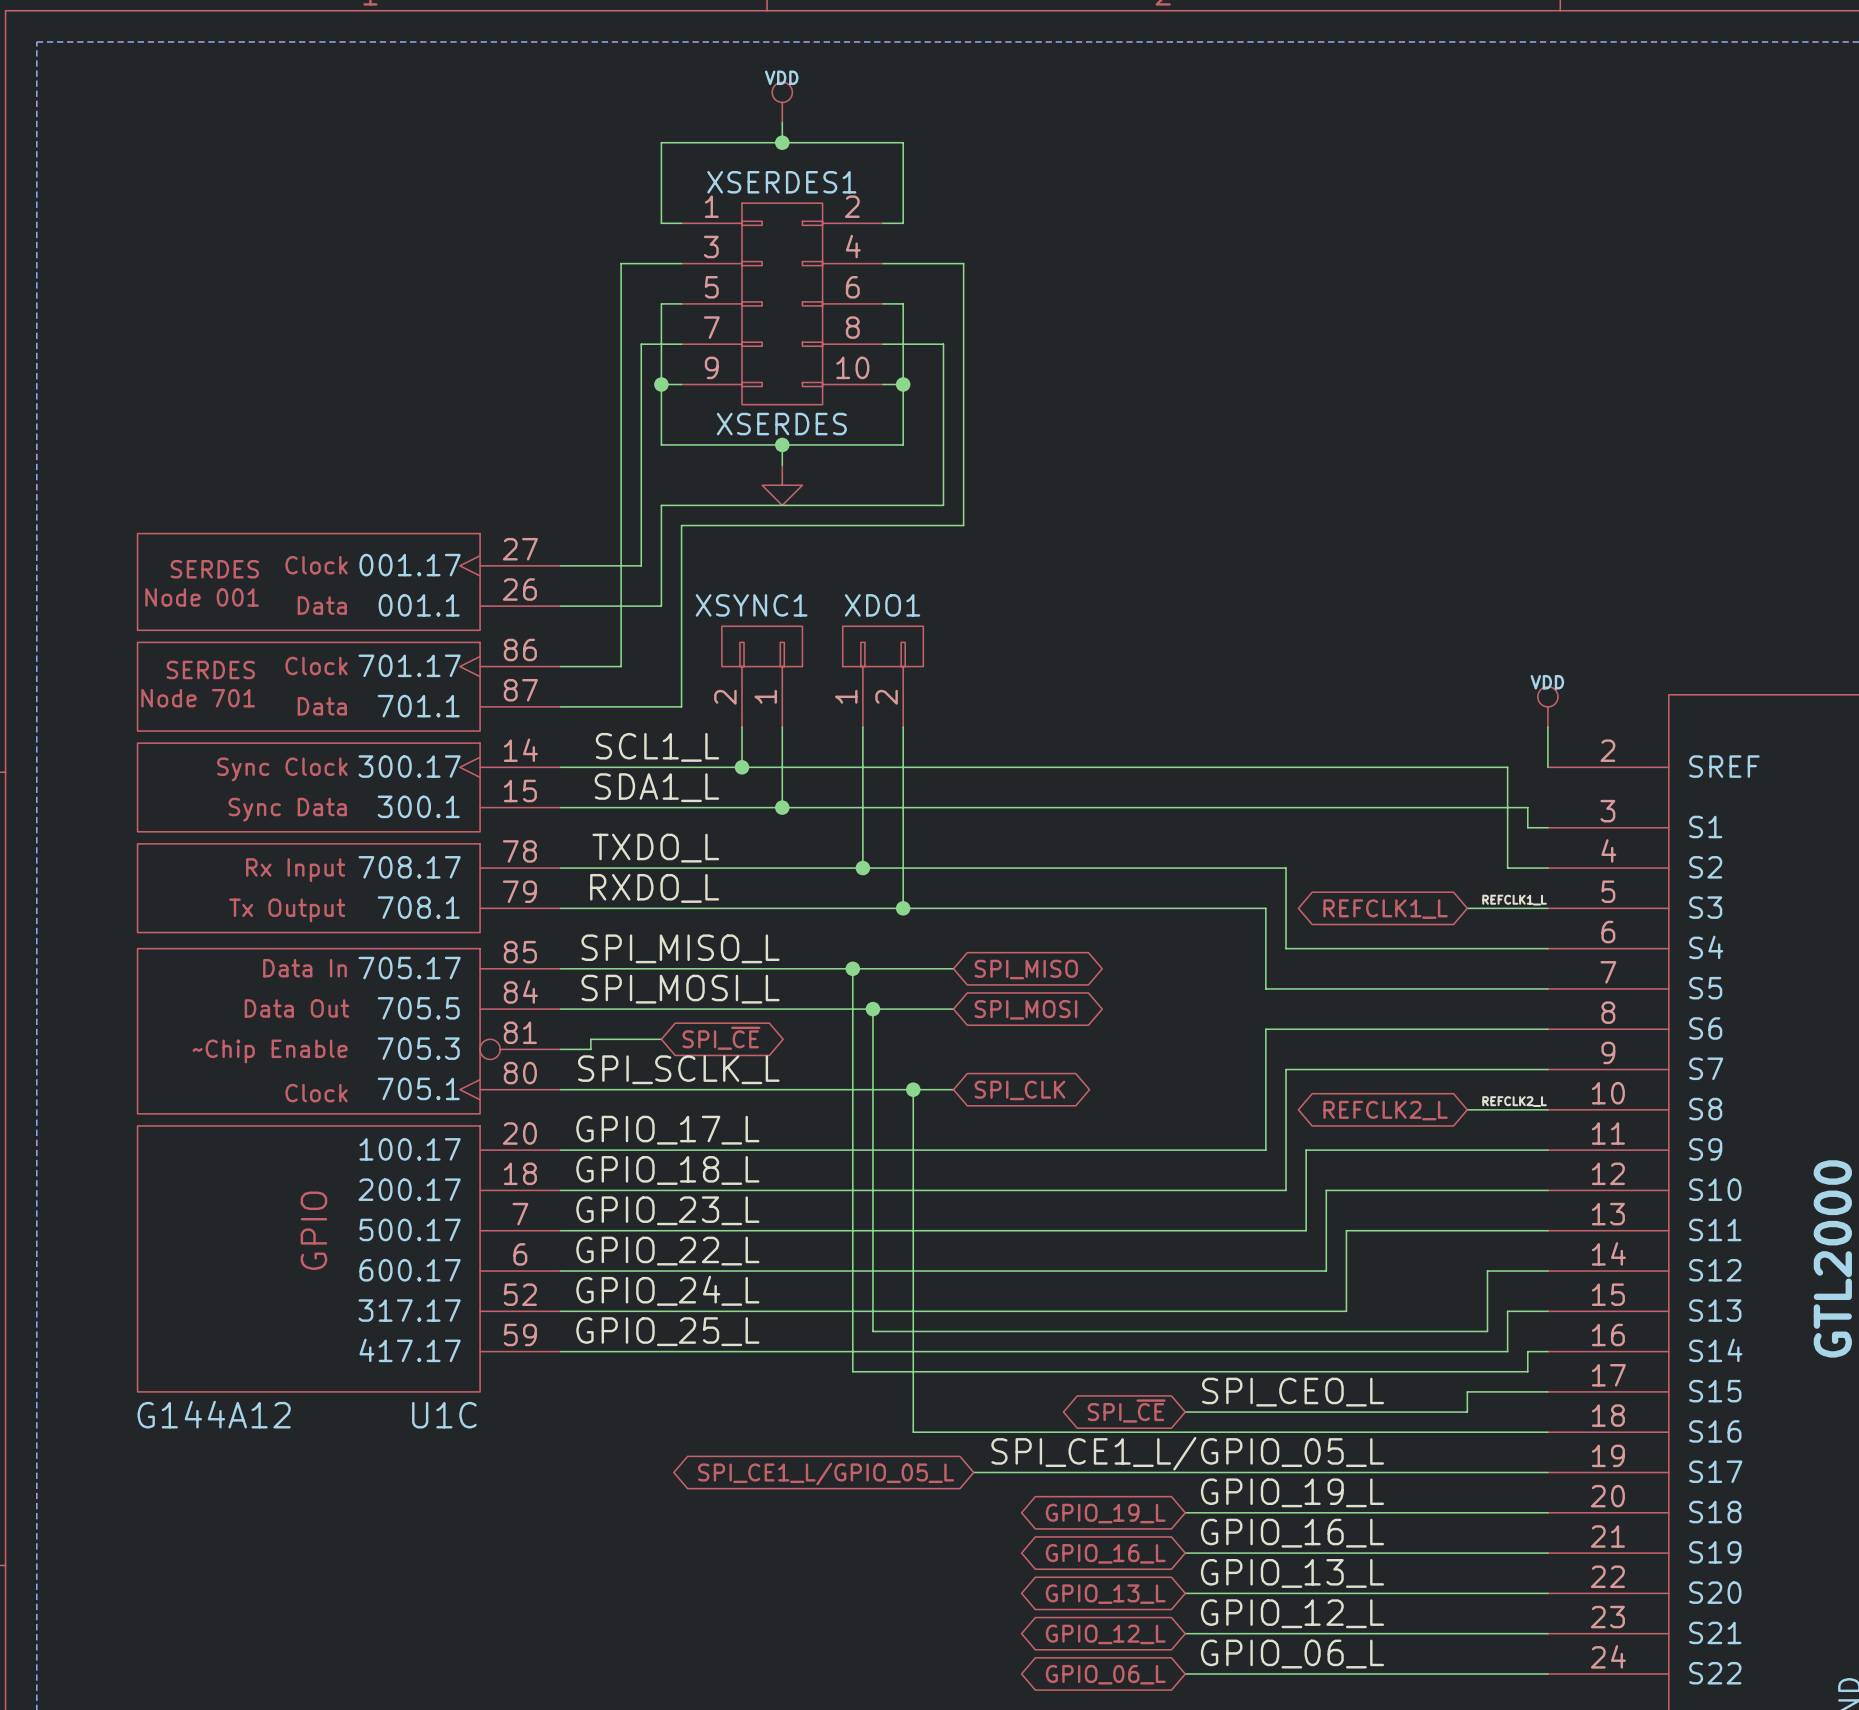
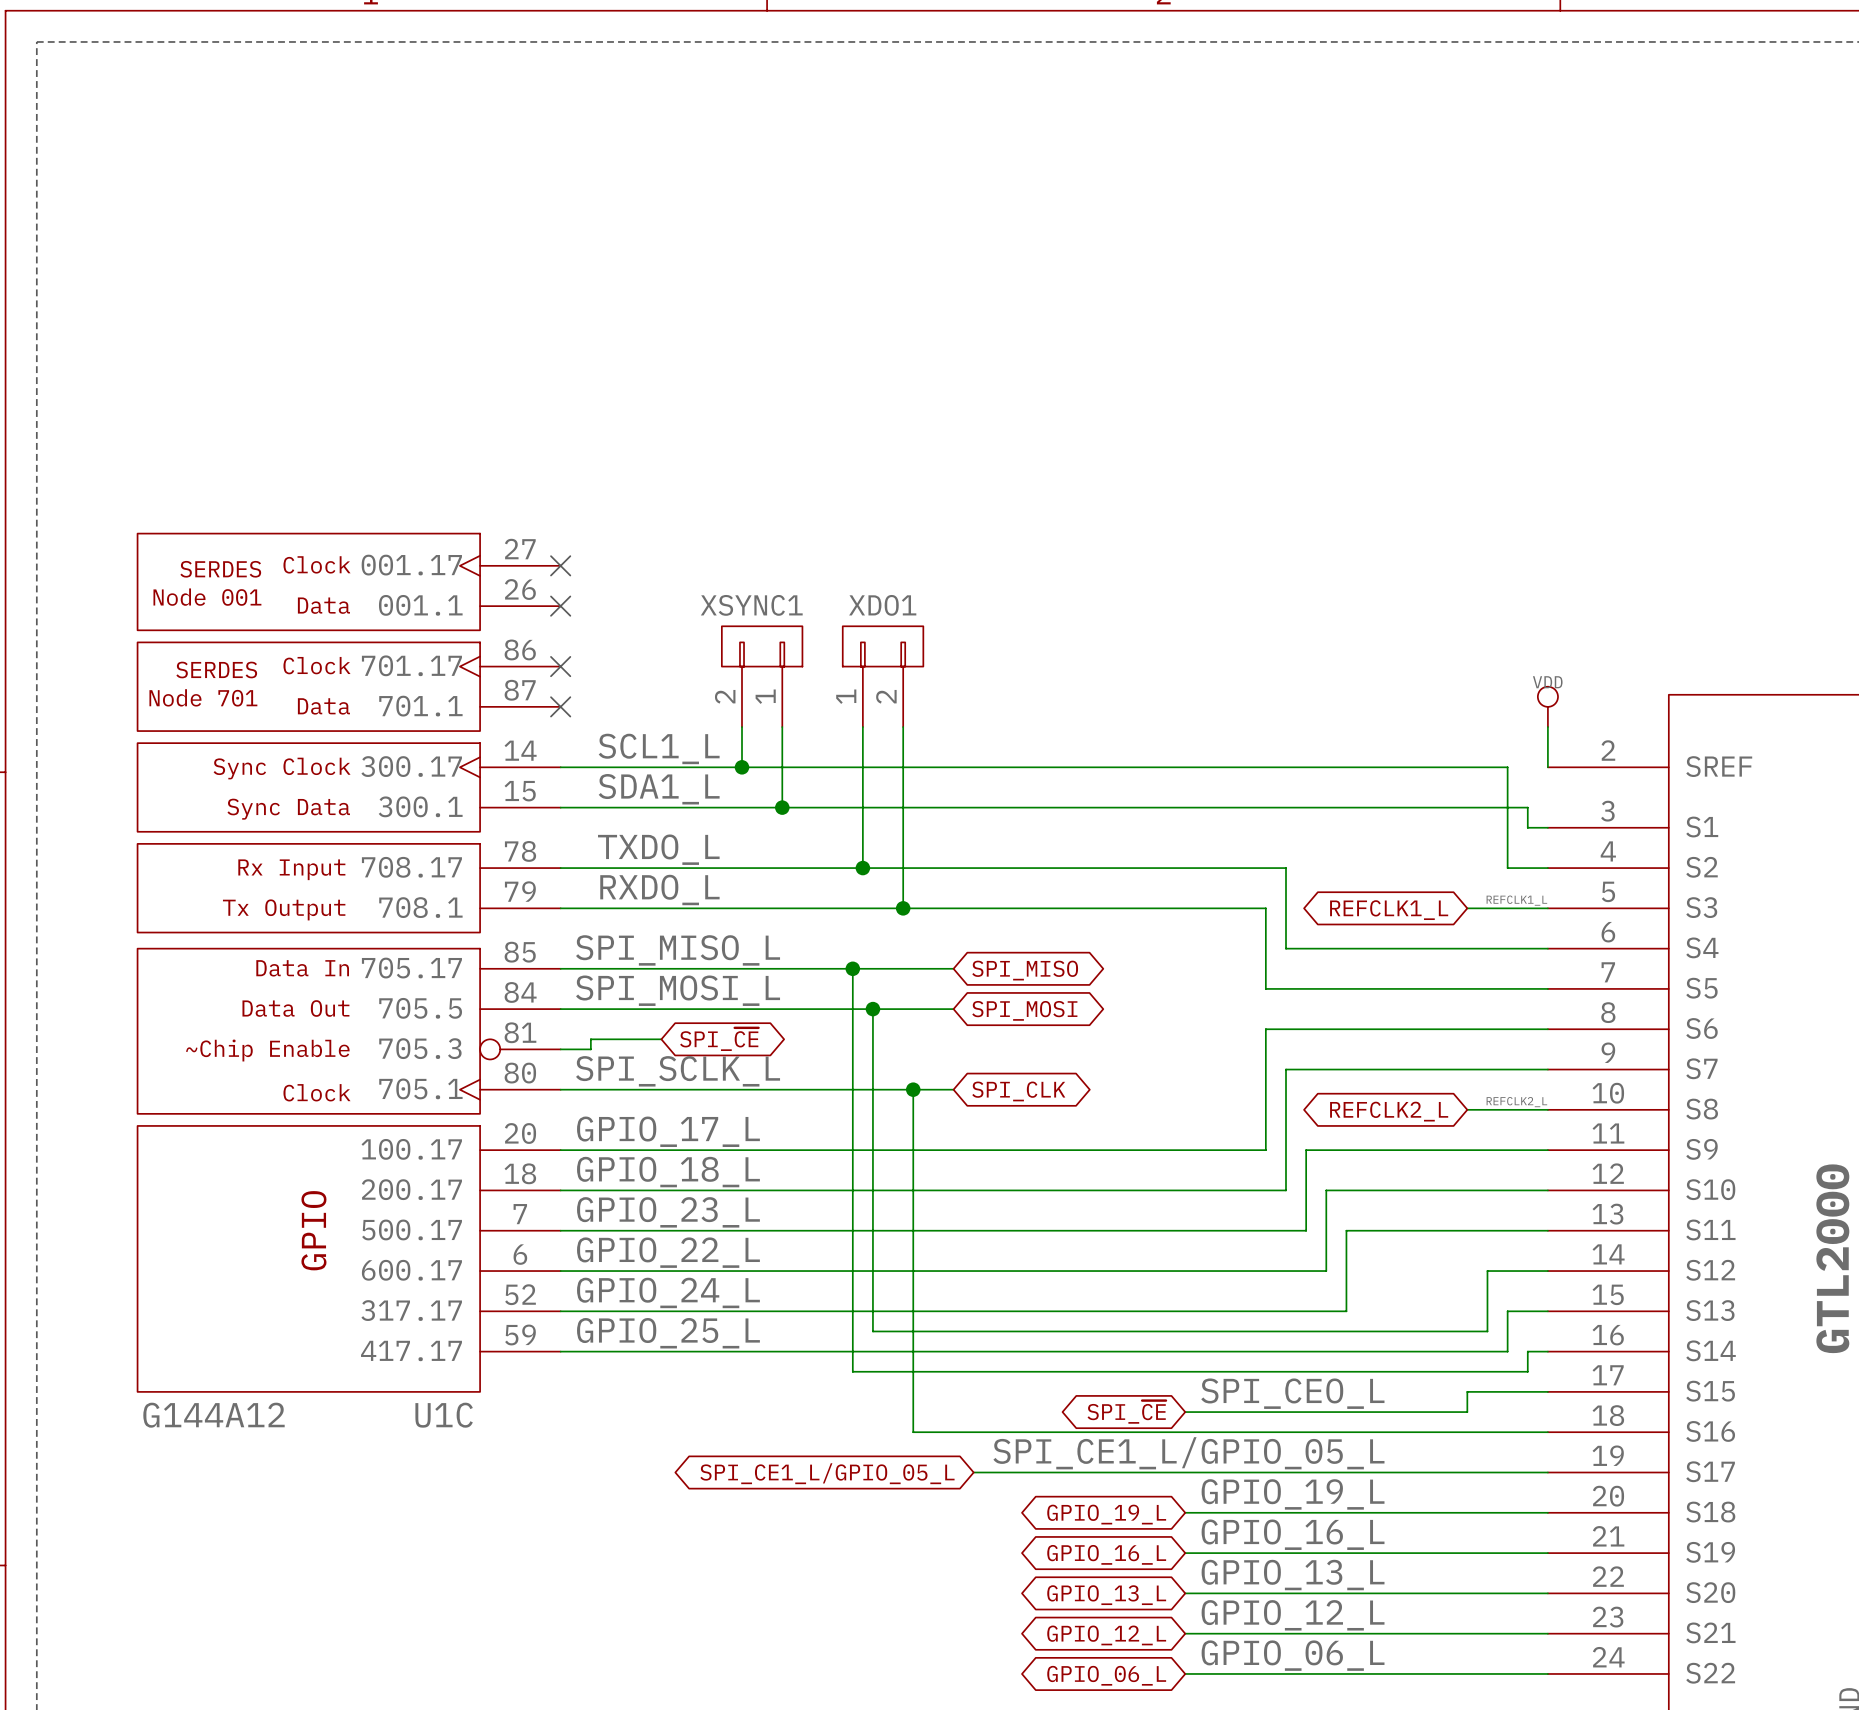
power symbol: VDD (782, 102) -> none
wire: (782, 122) (782, 142) -> none
junction: (782, 142) -> none
wire: (681, 223) (661, 223) (661, 142) (903, 142) (903, 223) (883, 223) -> none
wire: (681, 263) (621, 263) (621, 666) (560, 666) -> none
wire: (883, 263) (963, 263) (963, 525) (681, 525) (681, 706) (560, 706) -> none
wire: (681, 303) (661, 303) (661, 444) (903, 444) (903, 303) (883, 303) -> none
XSERDES1: XSERDES (782, 303) -> none
wire: (681, 344) (641, 344) (641, 565) (560, 565) -> none
wire: (883, 344) (943, 344) (943, 505) (661, 505) (661, 606) (560, 606) -> none
wire: (661, 384) (681, 384) -> none
junction: (661, 384) -> none
wire: (883, 384) (903, 384) -> none
junction: (903, 384) -> none
wire: (782, 444) (782, 465) -> none
junction: (782, 444) -> none
power symbol: (782, 485) -> none
no-connect mark: none -> (560, 565)
no-connect mark: none -> (560, 606)
no-connect mark: none -> (560, 666)
no-connect mark: none -> (560, 706)

